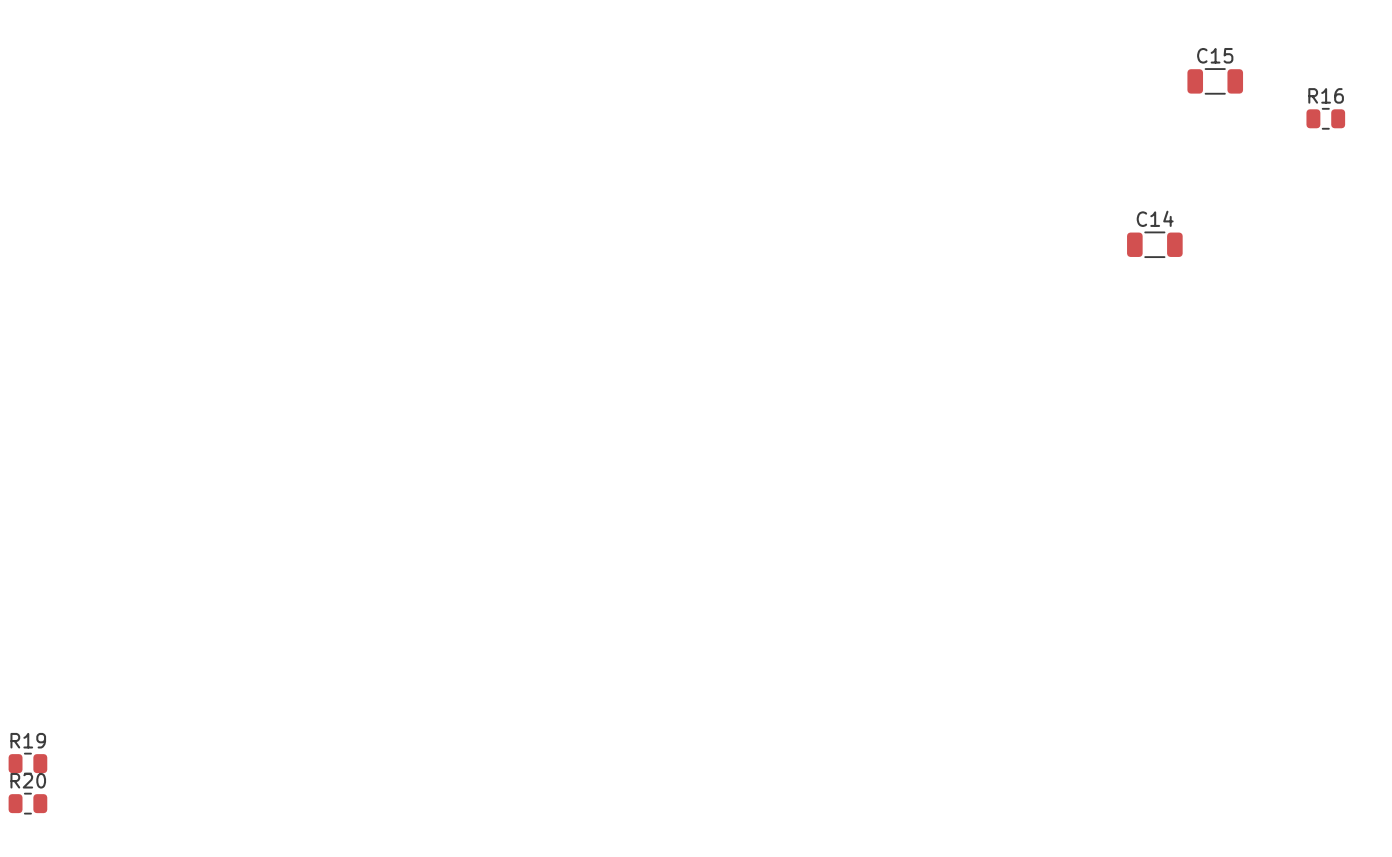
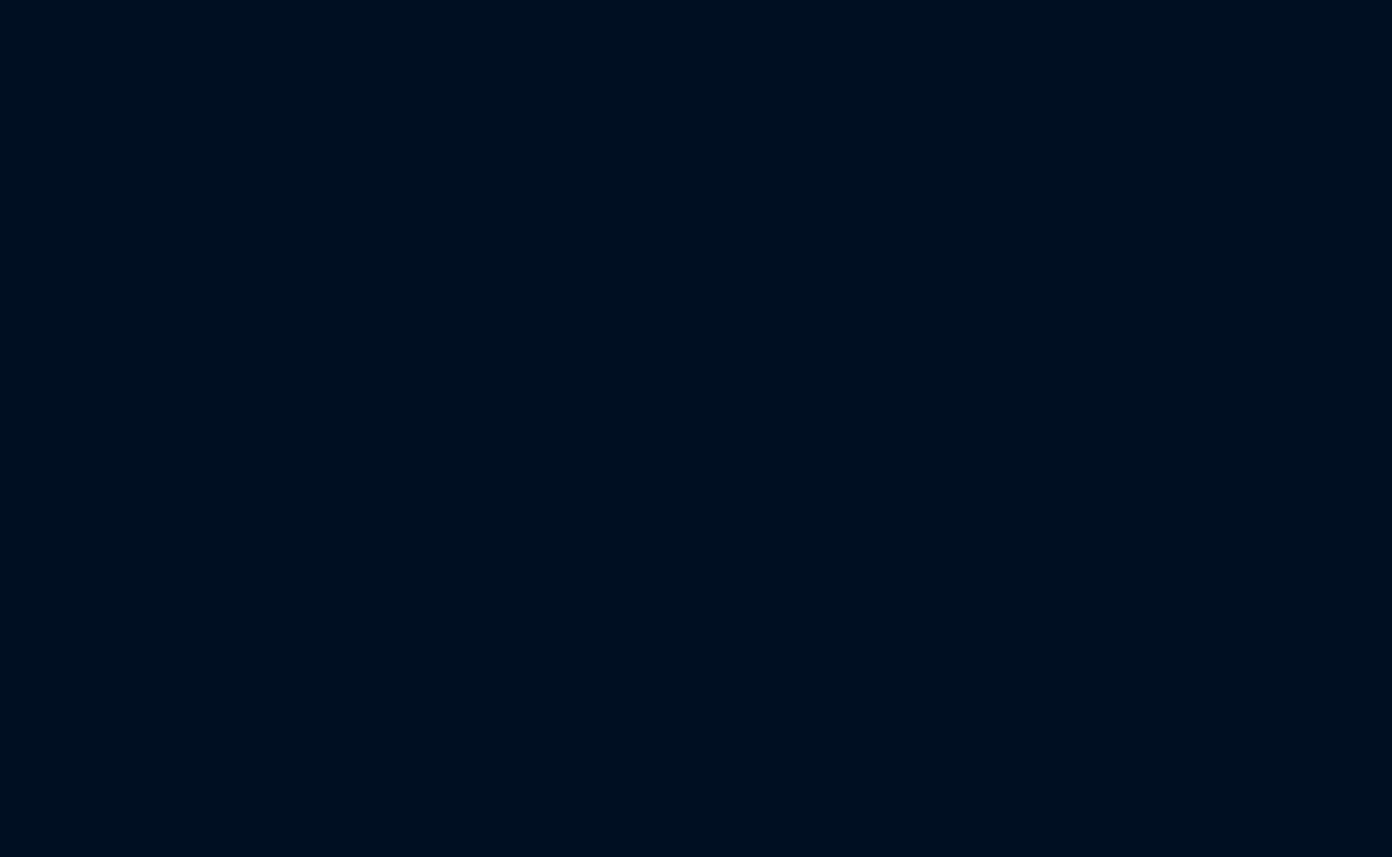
C15: (1215, 81) -> none
R16: (1325, 118) -> none
C14: (1154, 244) -> none
R19: (27, 763) -> none
R20: (27, 803) -> none

